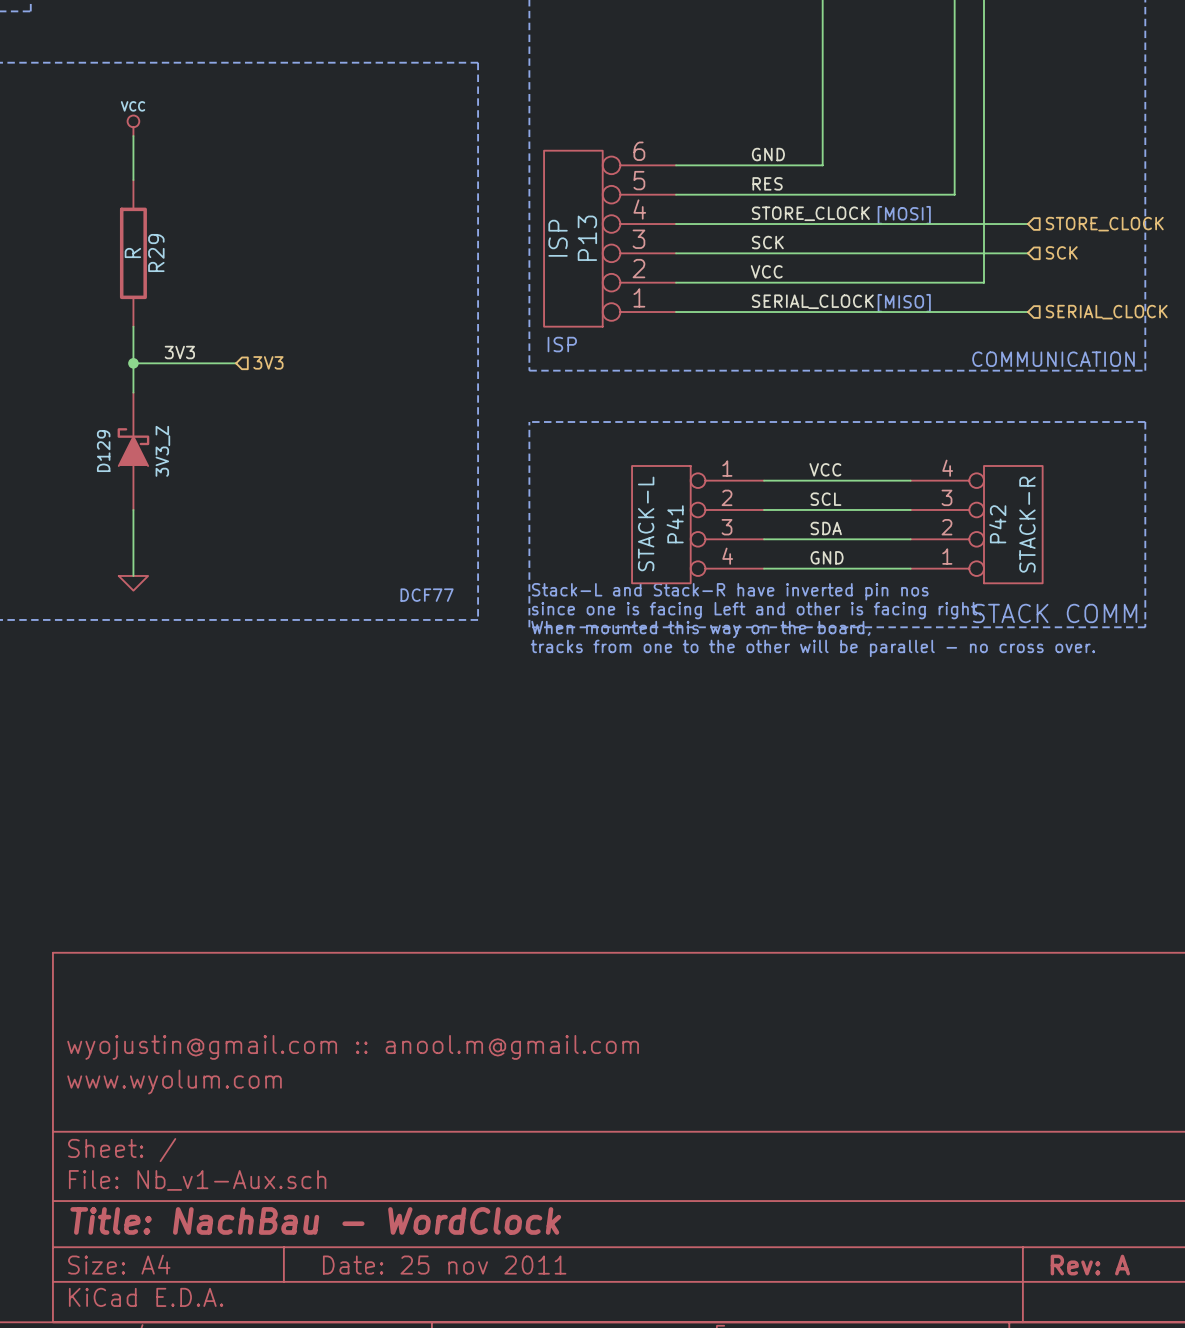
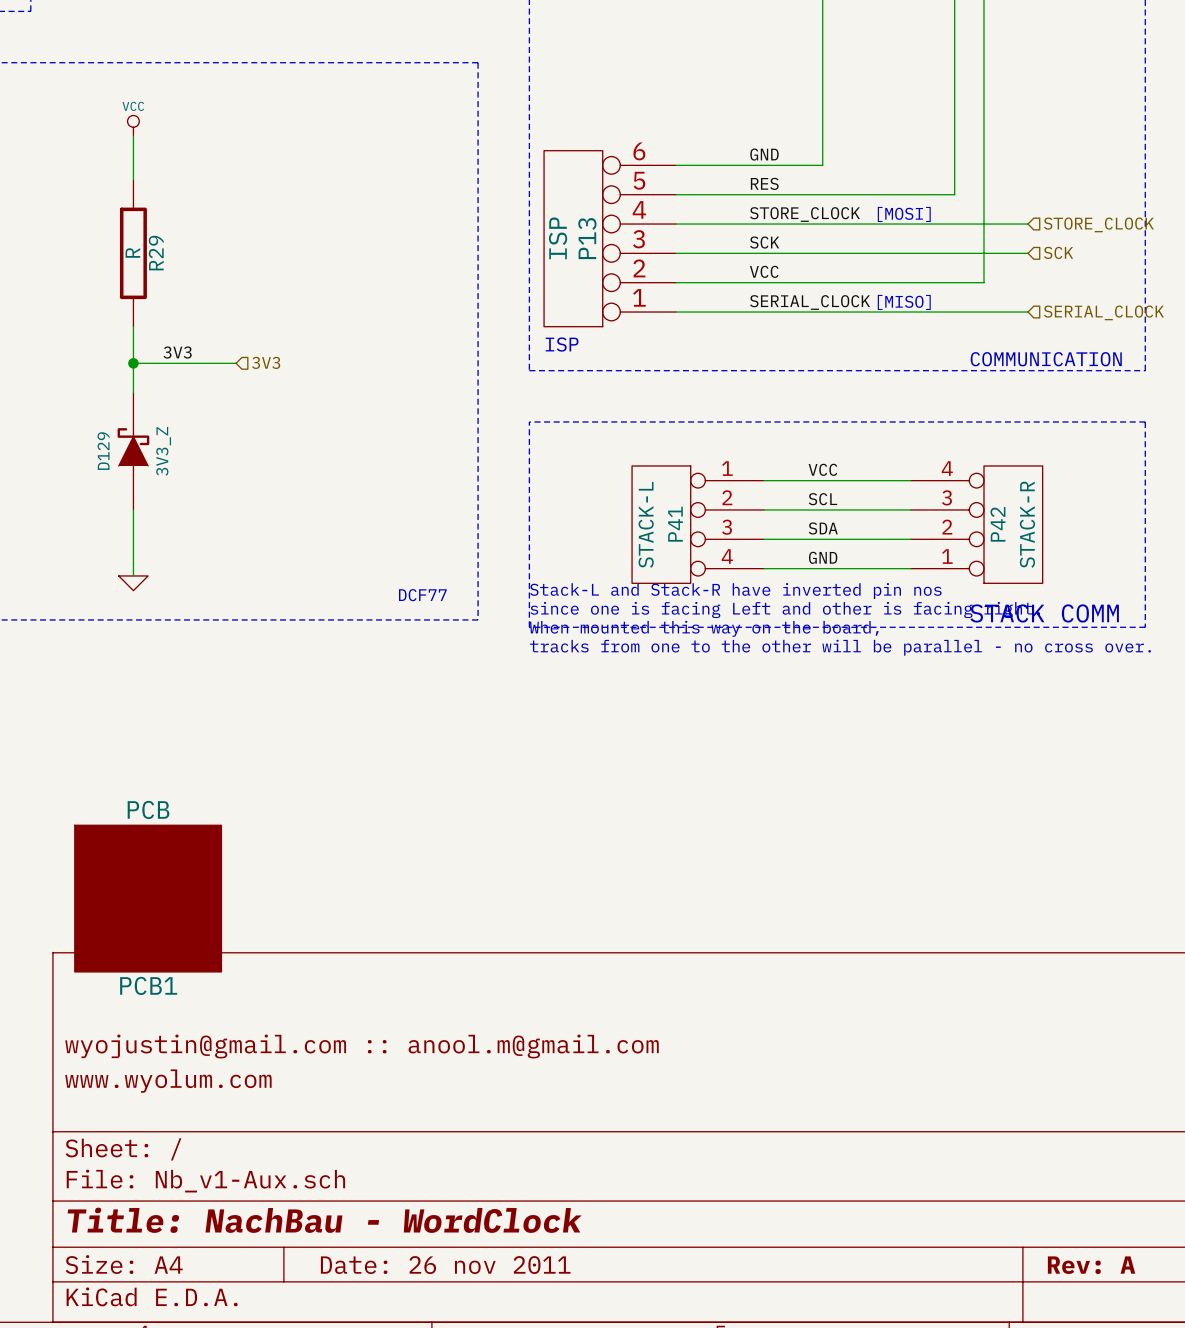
PCB1: none -> PCB (148, 898)
title block: Date: 25 nov 2011 (444, 1265) -> Date: 26 nov 2011 (445, 1265)

